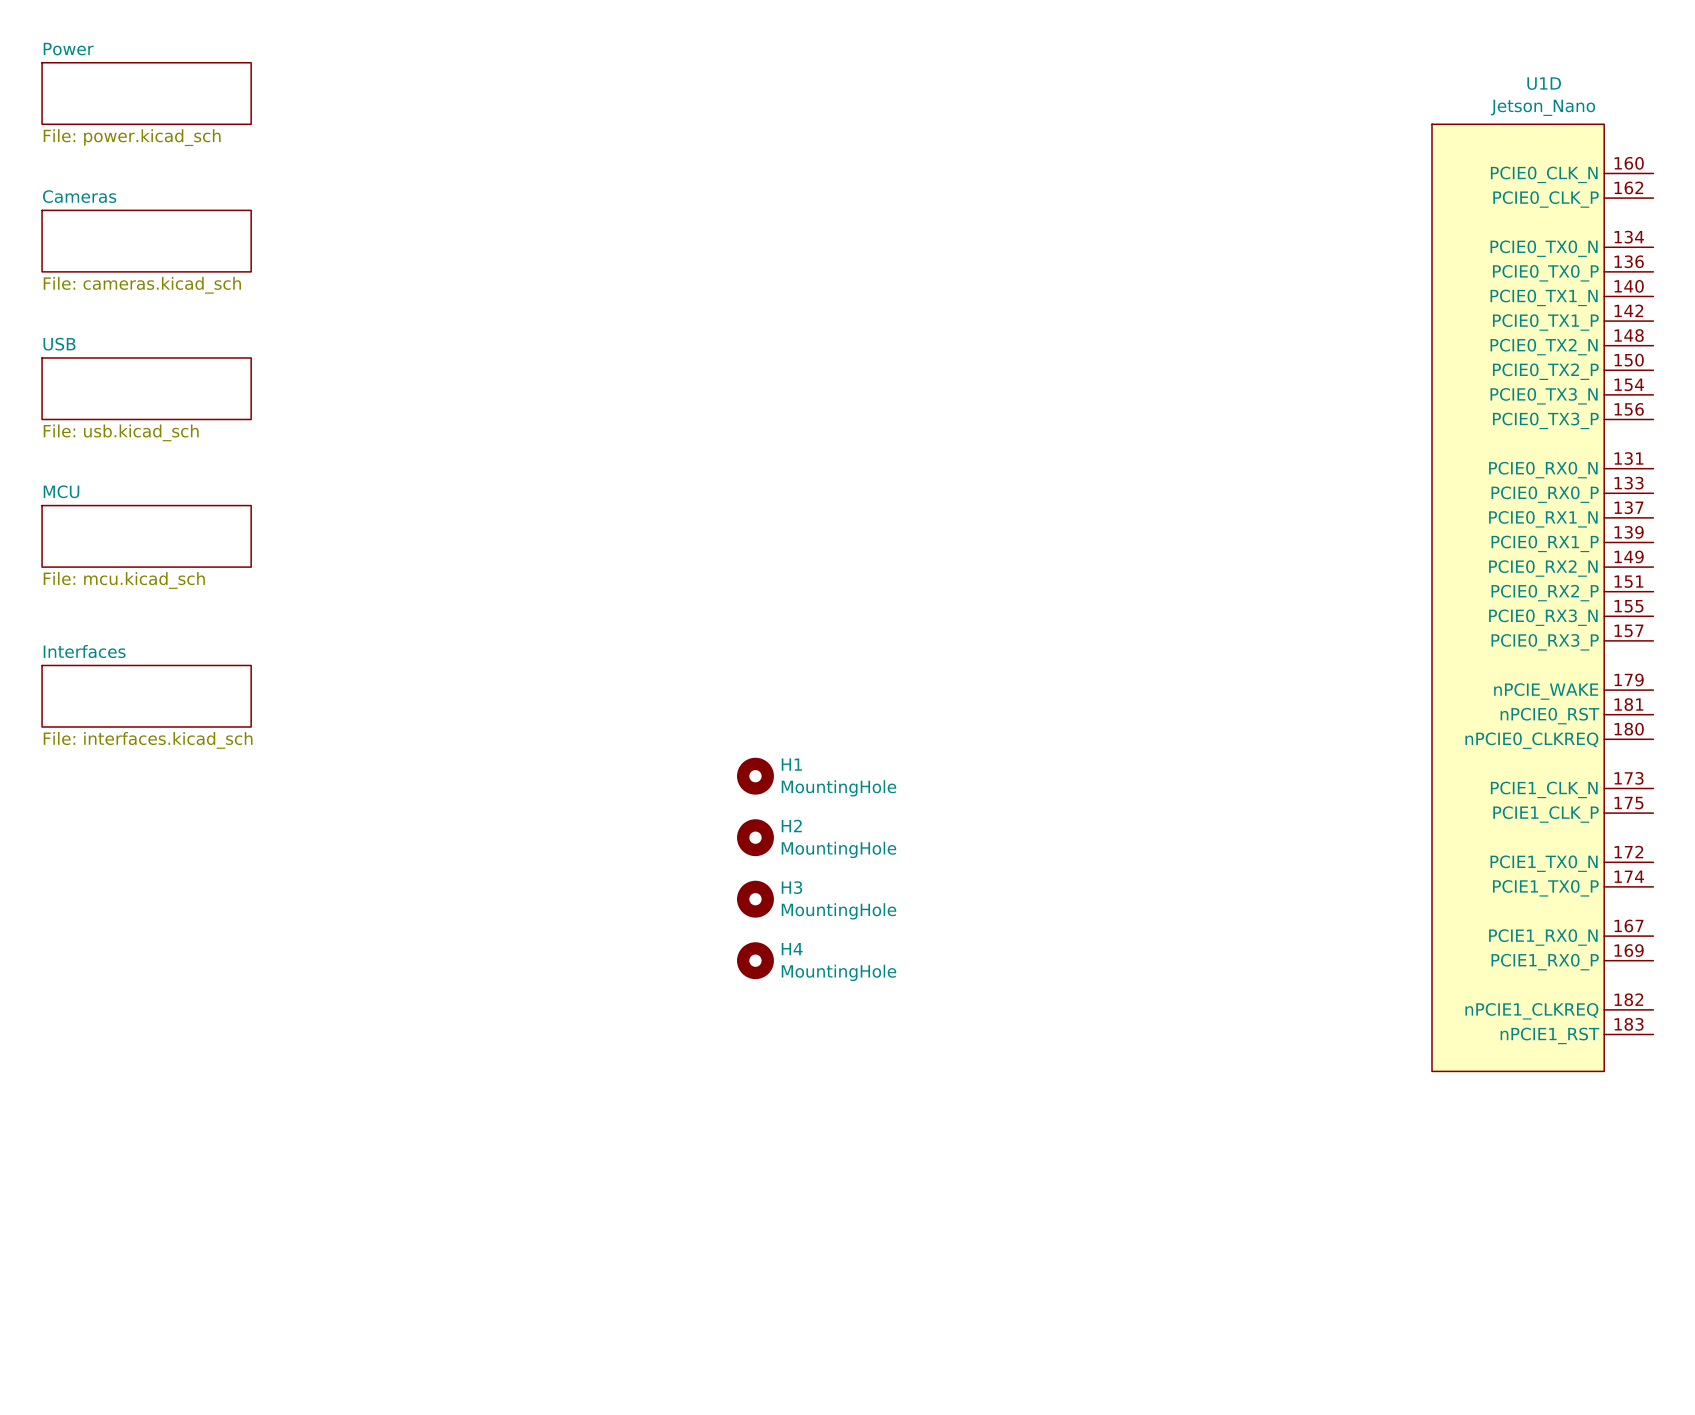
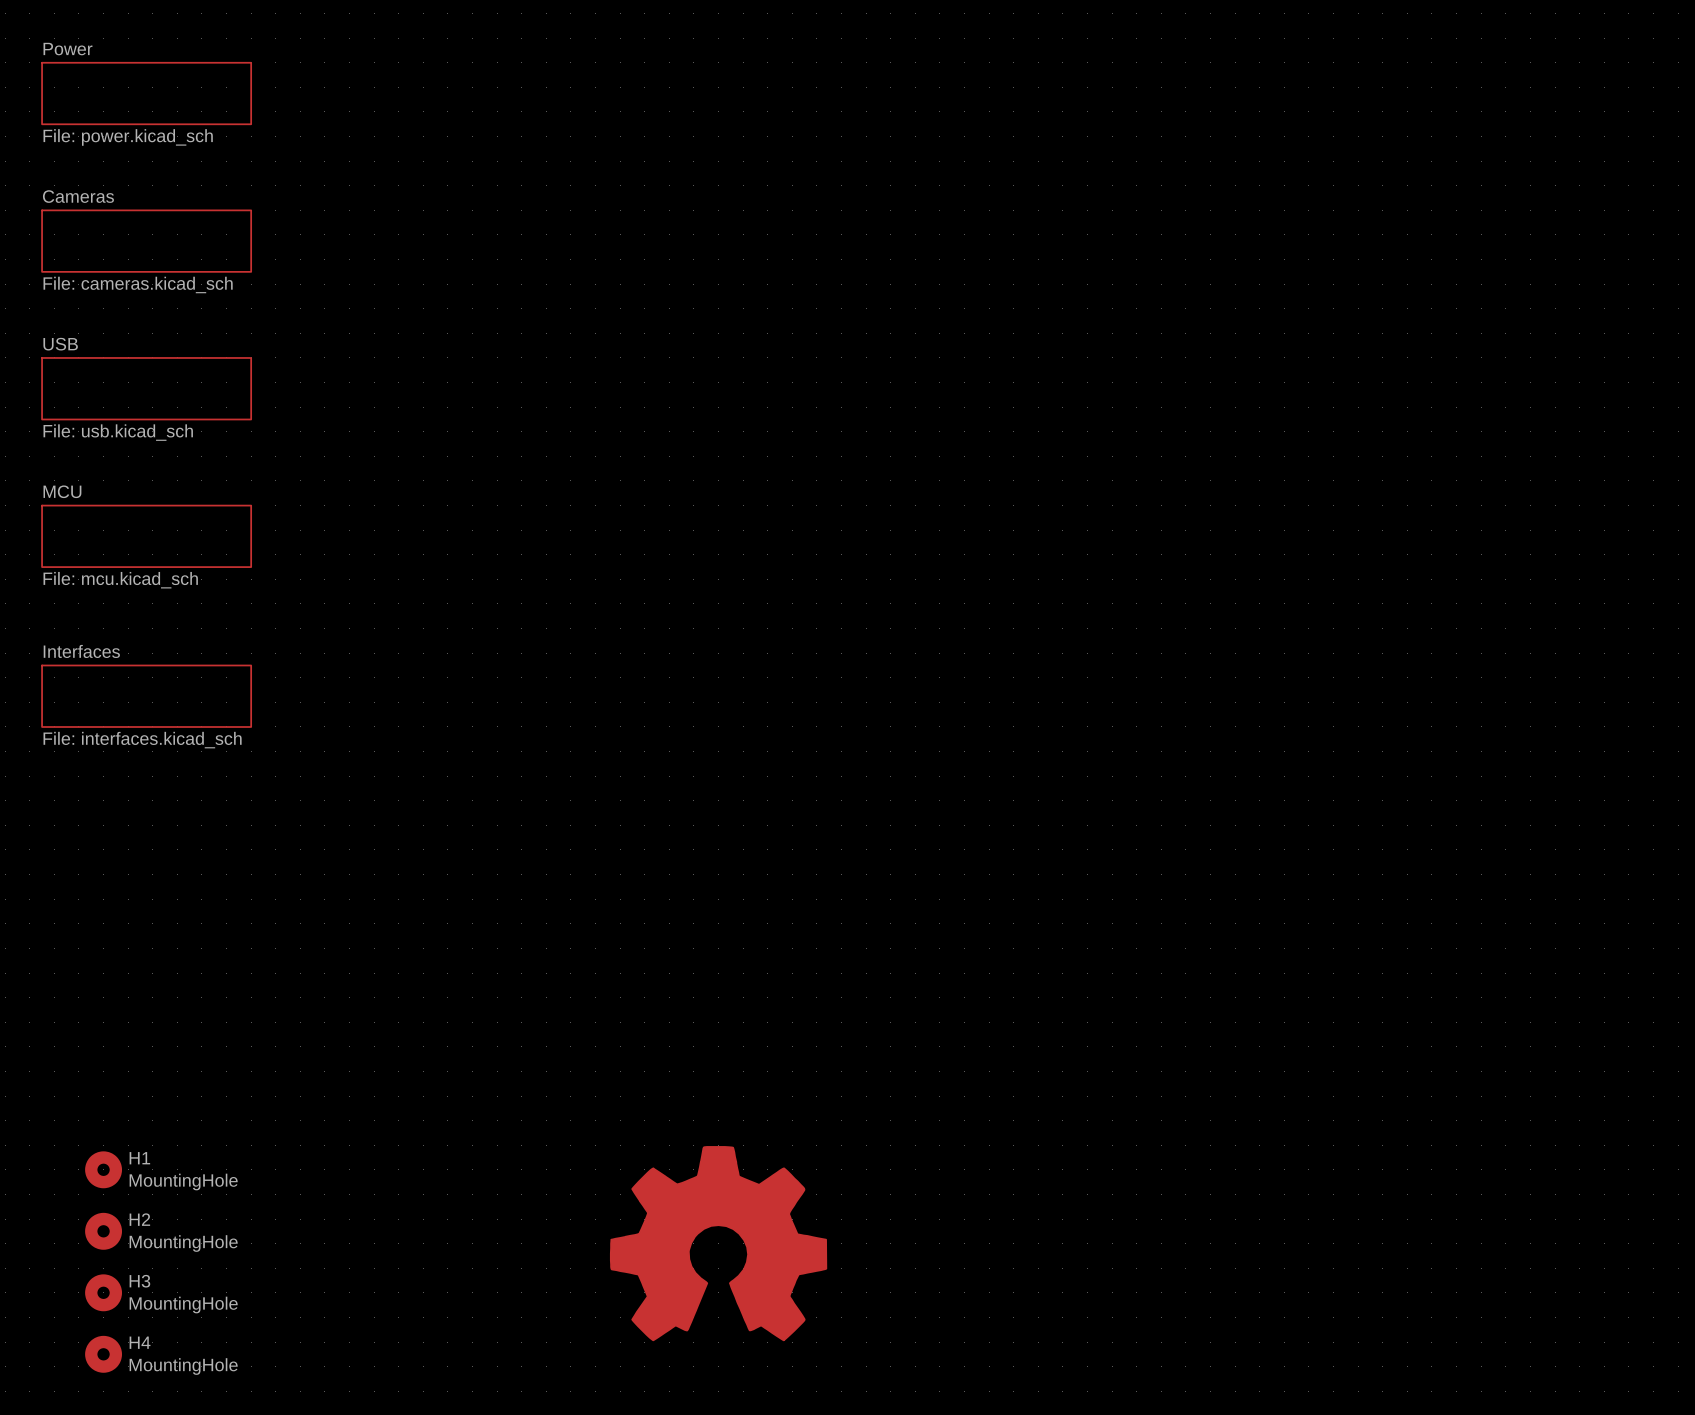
U1D: Jetson_Nano (1542, 597) -> none
H1 position: (755, 776) -> (103, 1169)
H2 position: (755, 837) -> (103, 1231)
H3 position: (755, 899) -> (103, 1292)
H4 position: (755, 960) -> (103, 1354)
part: none -> (718, 1243)

